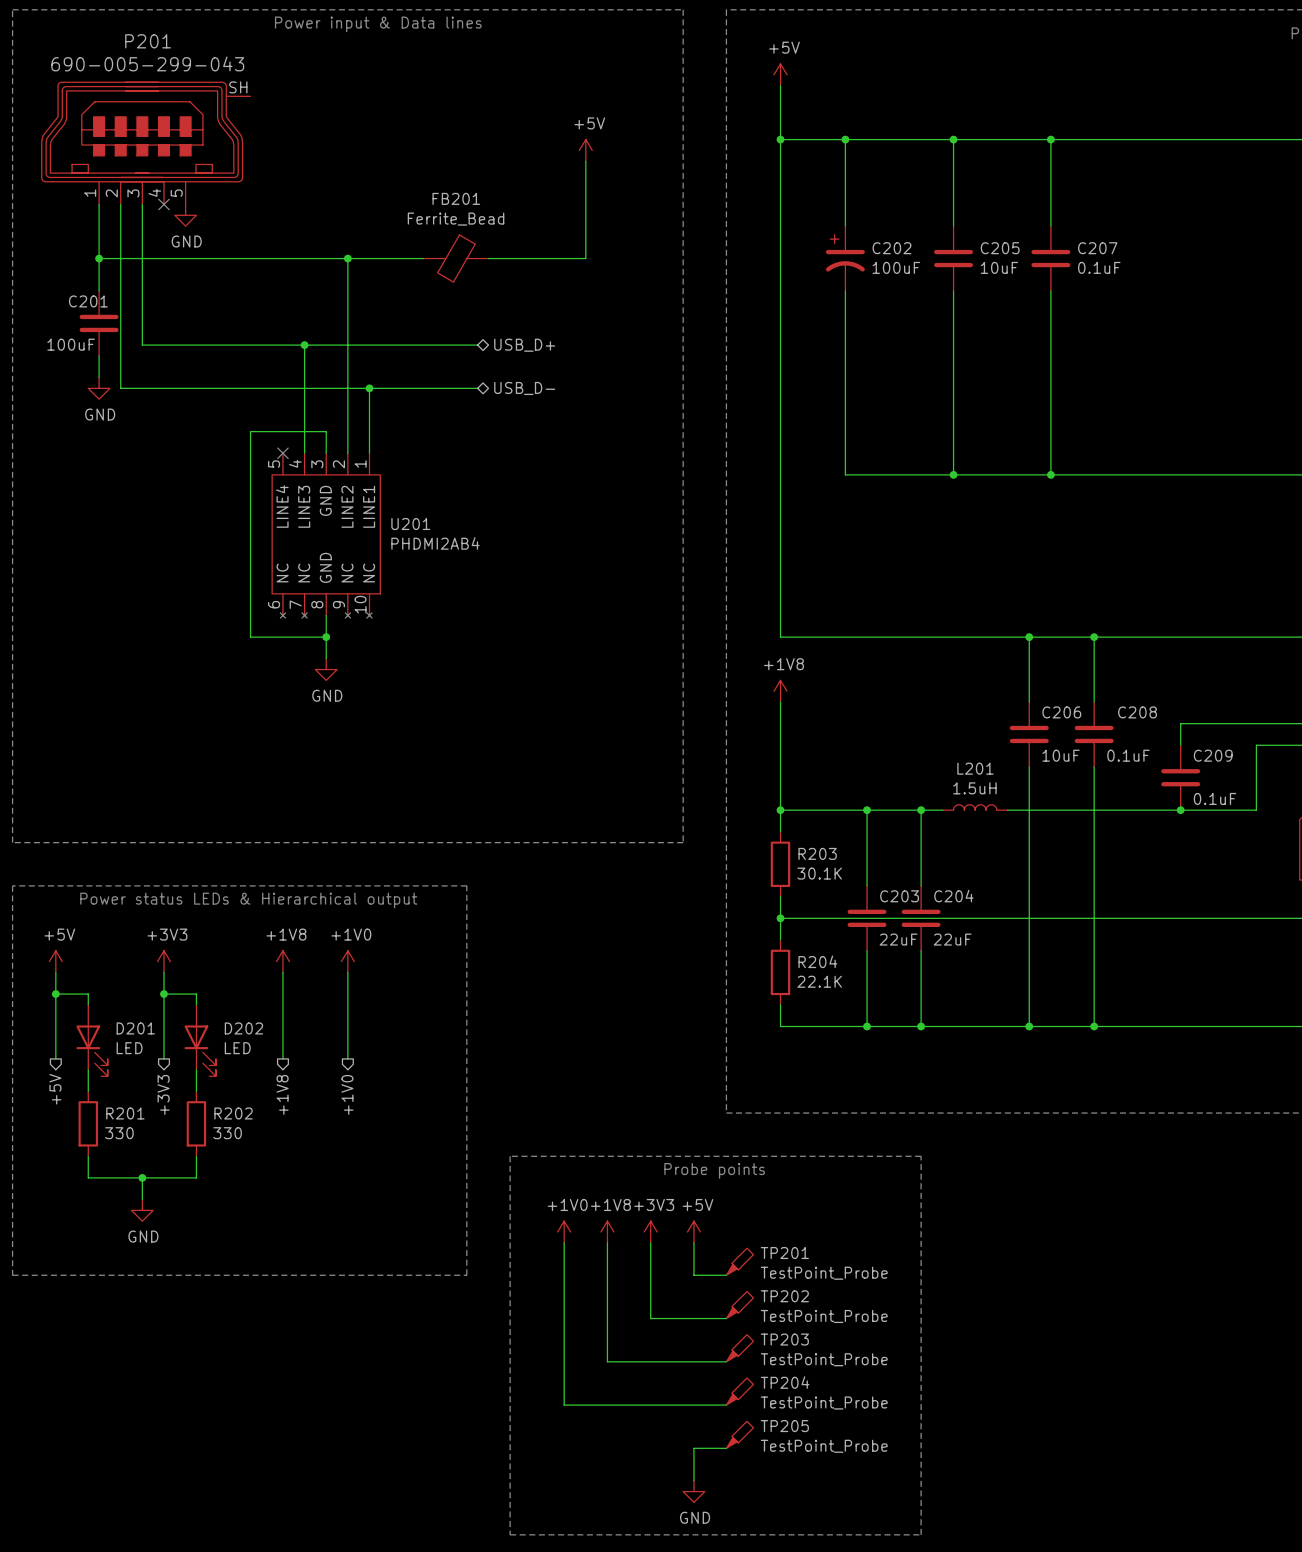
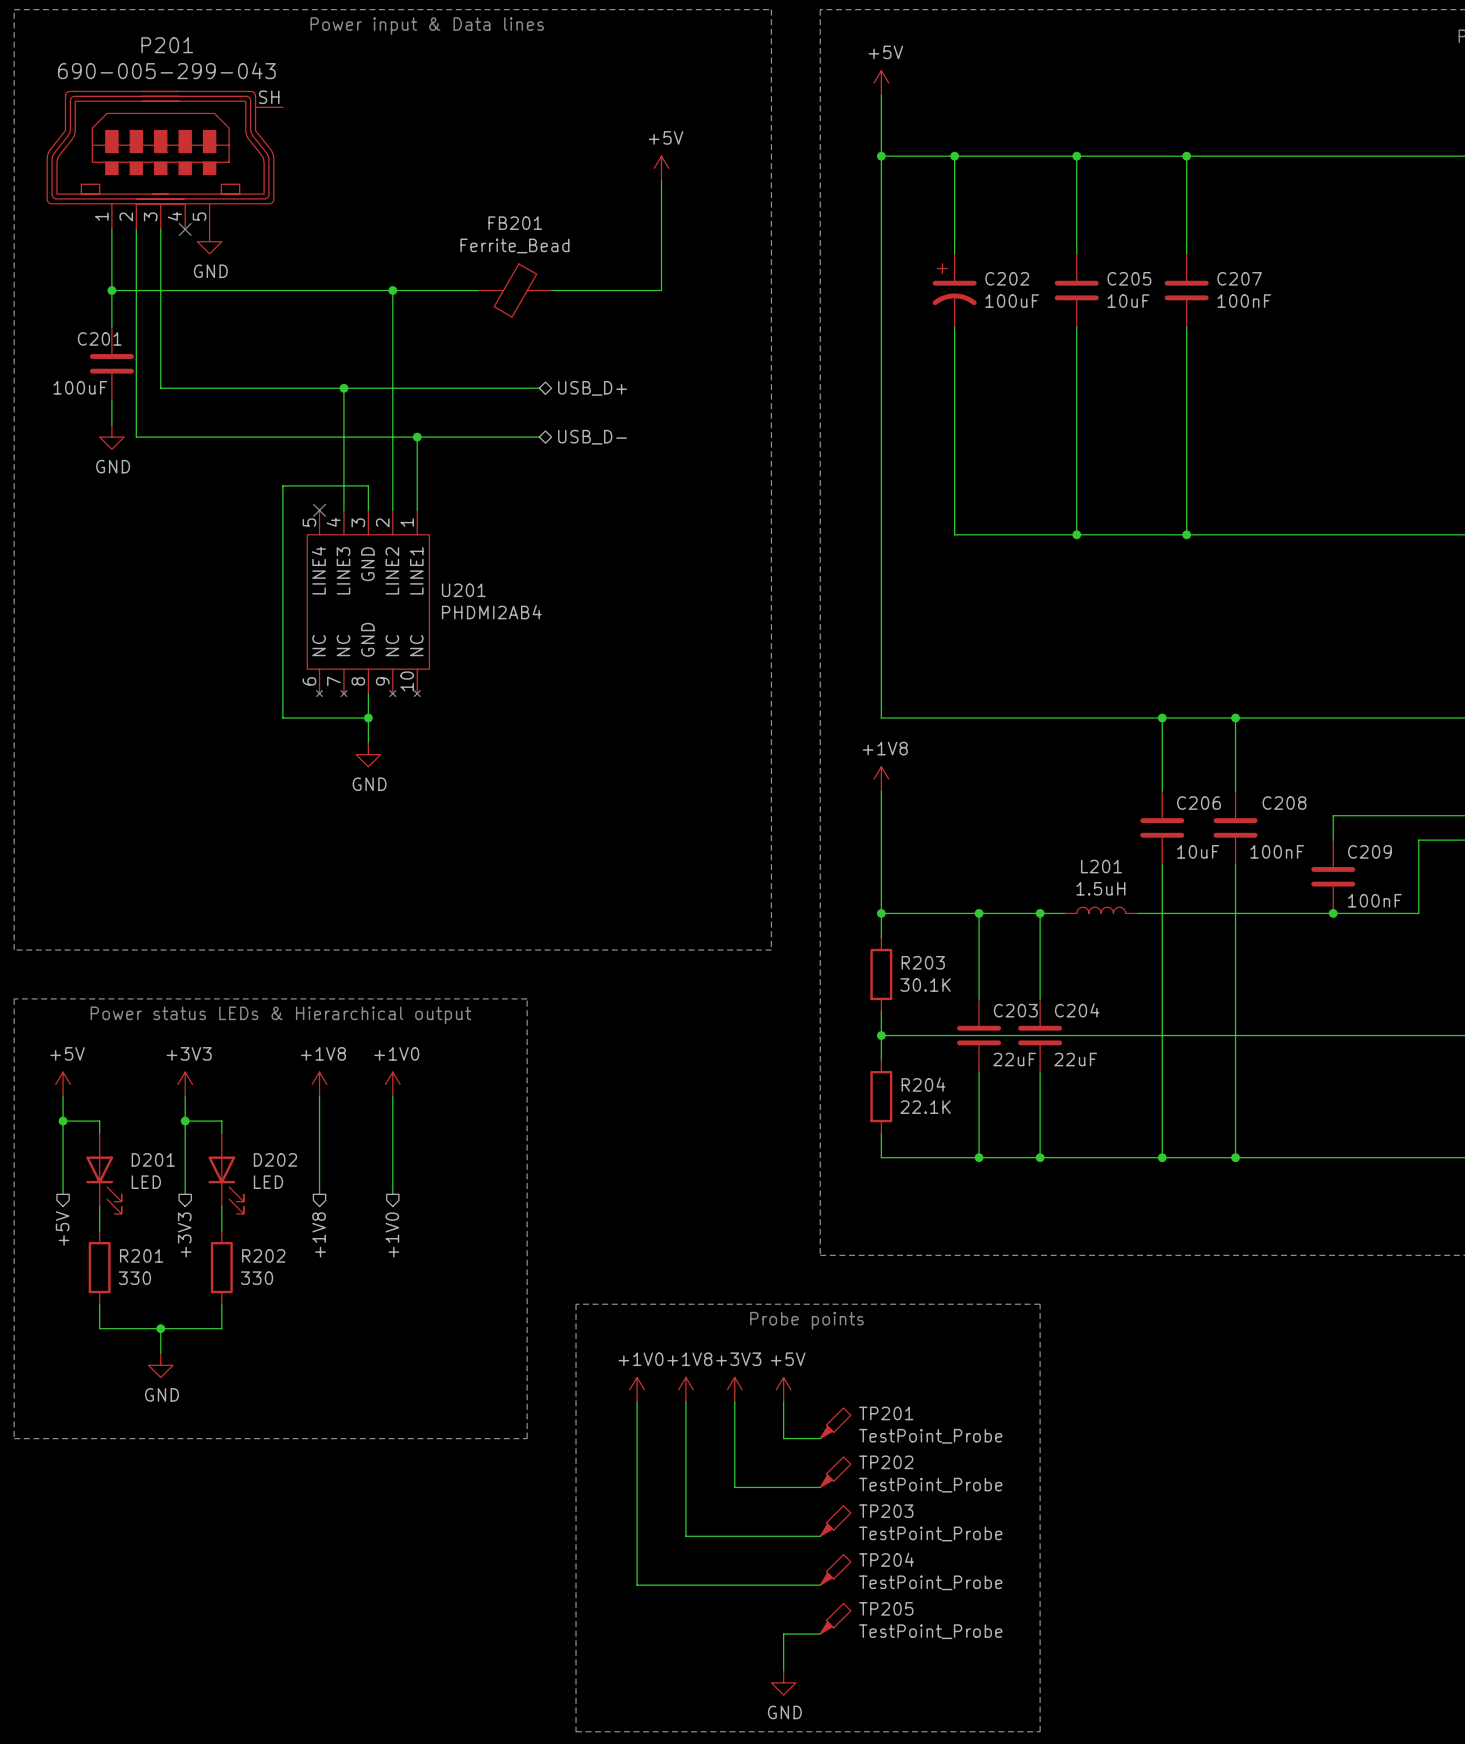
C207 value: 0.1uF (1099, 267) -> 100nF (1244, 301)
C208 value: 0.1uF (1128, 755) -> 100nF (1277, 851)
C209 value: 0.1uF (1215, 798) -> 100nF (1374, 900)

